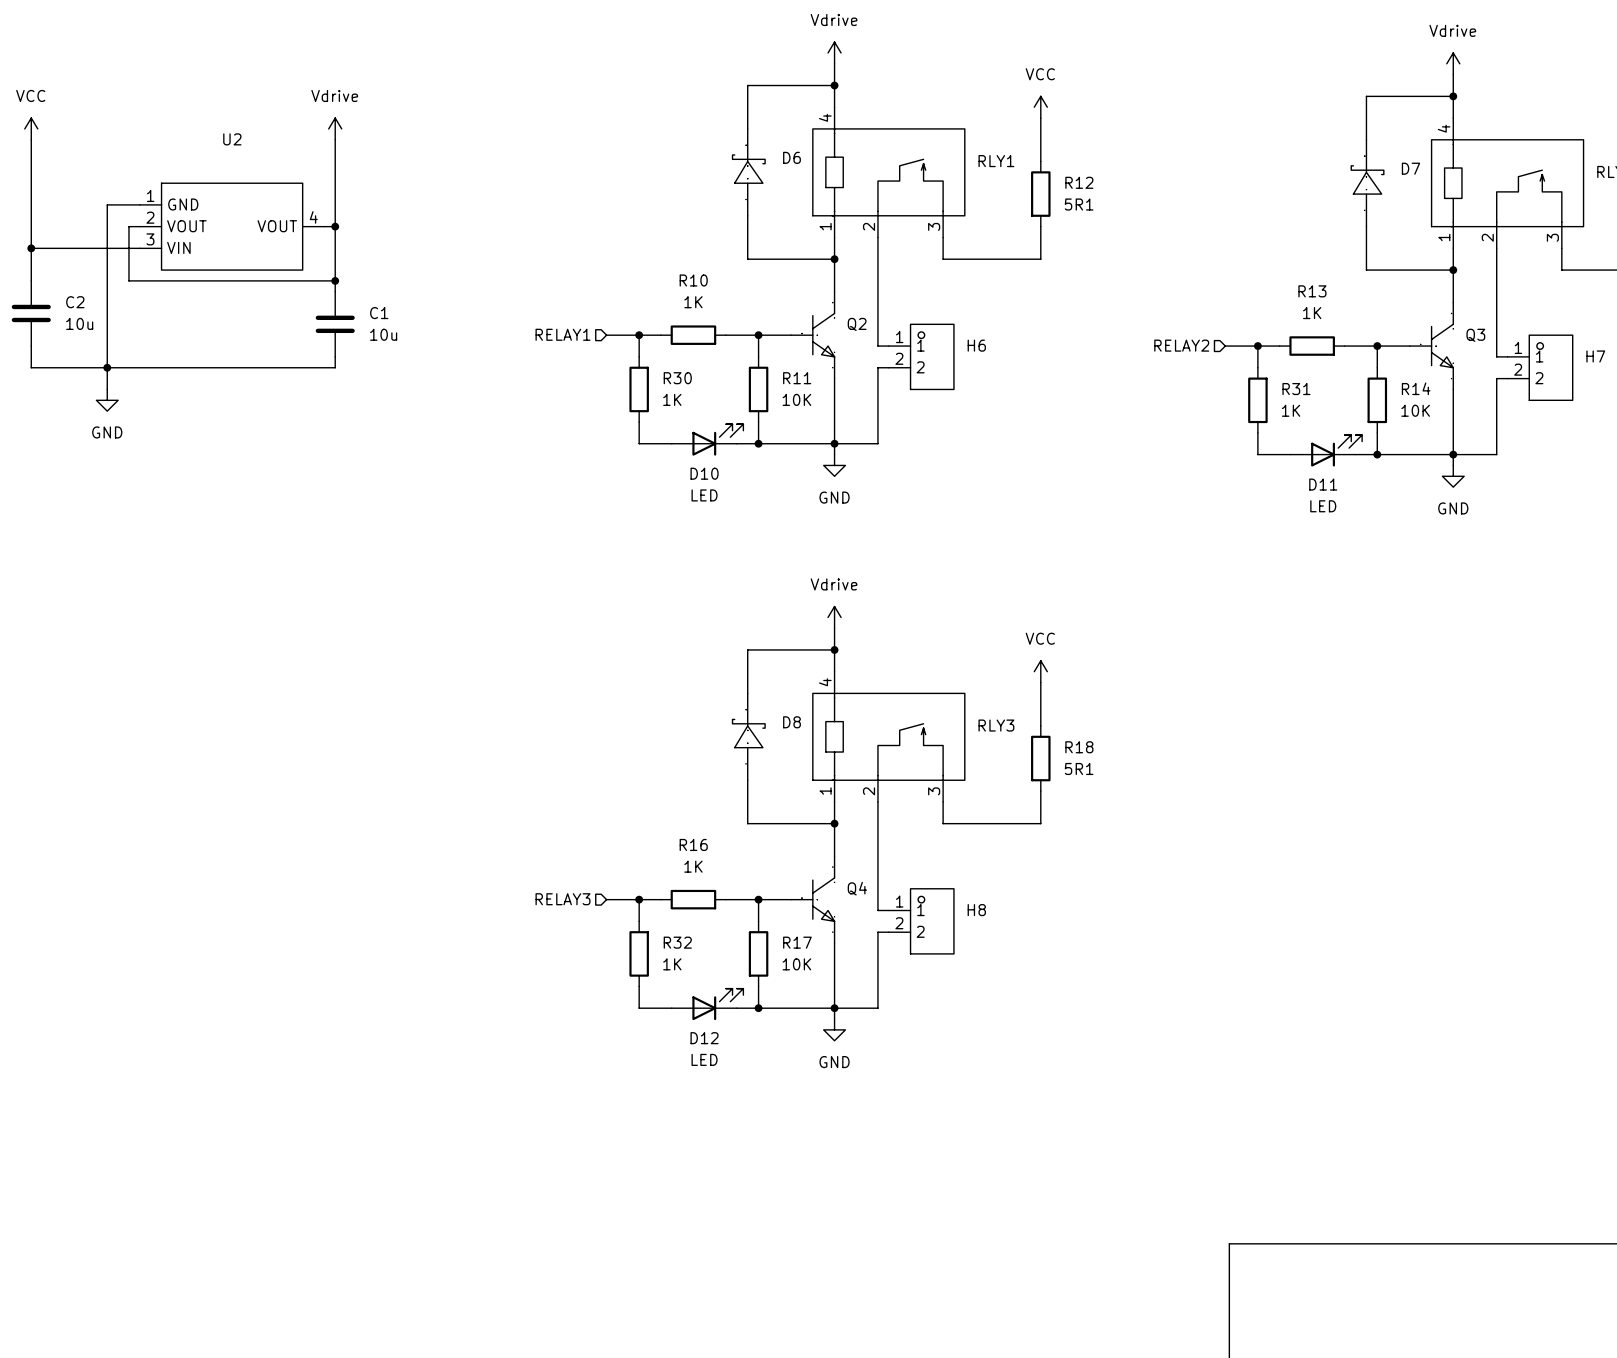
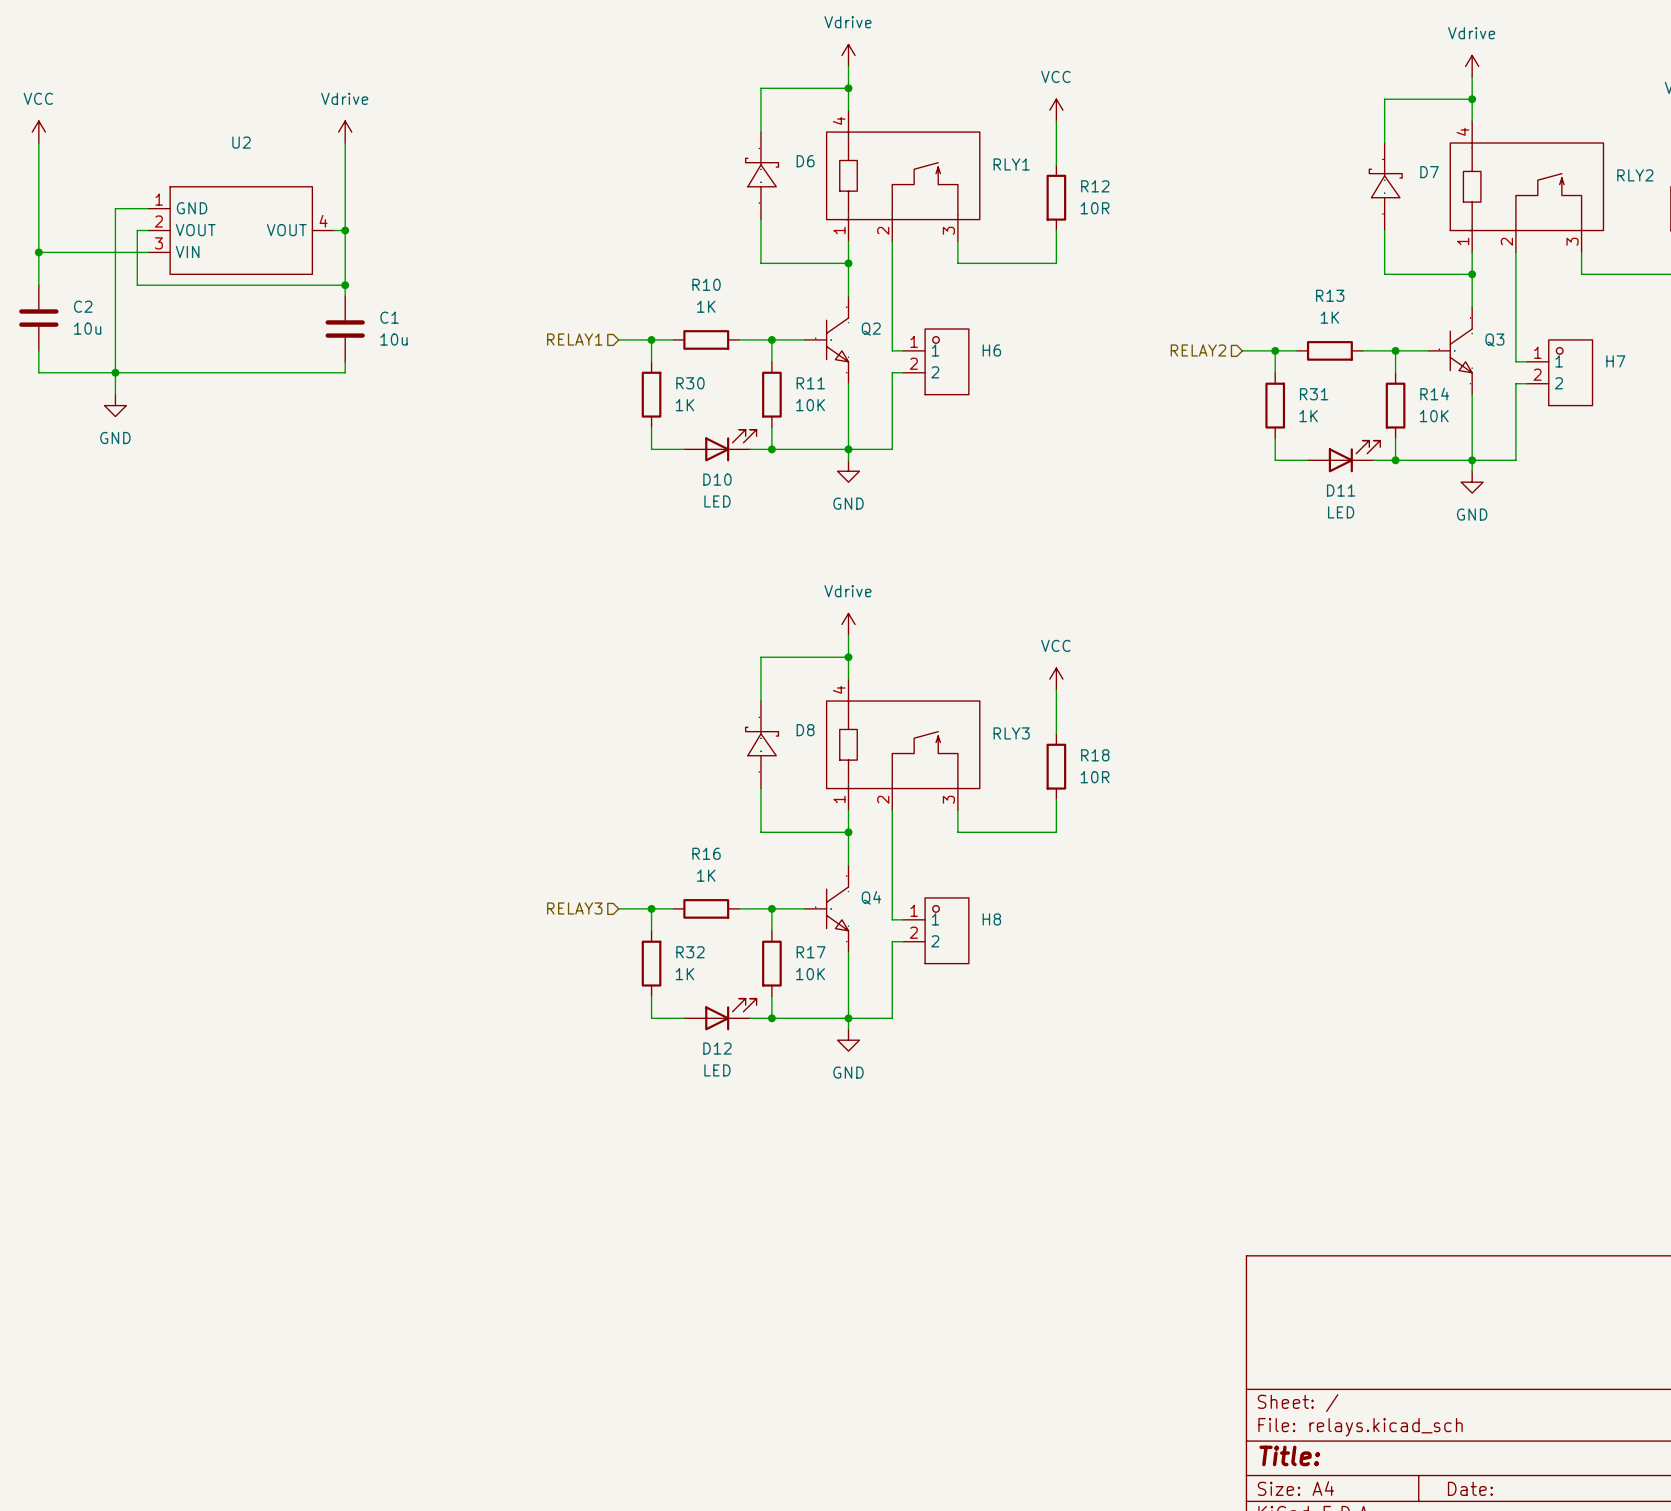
R12 value: 5R1 (1079, 204) -> 10R (1095, 208)
R18 value: 5R1 (1079, 768) -> 10R (1095, 777)

